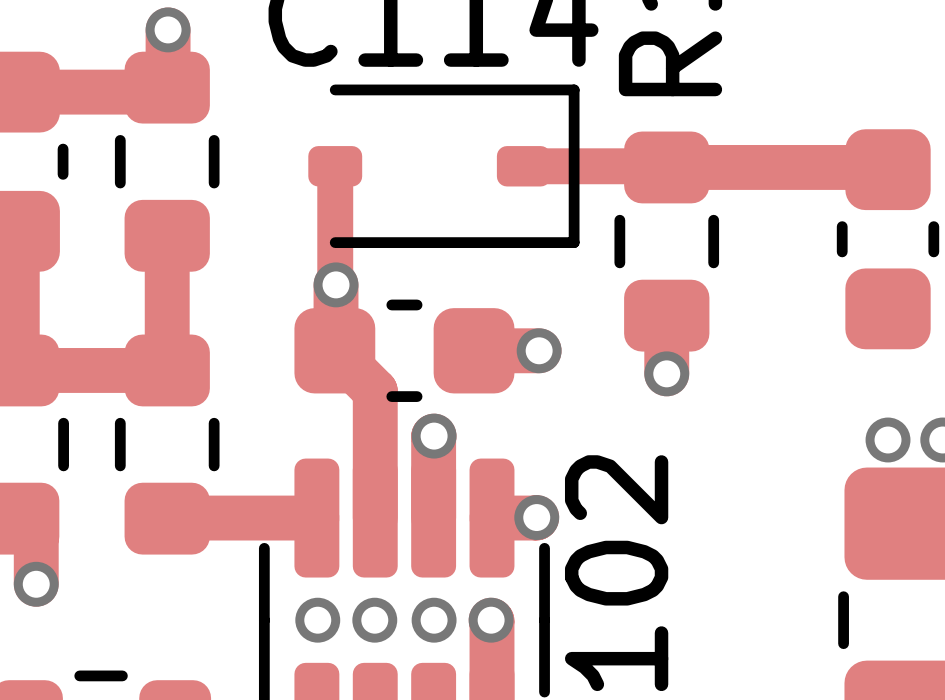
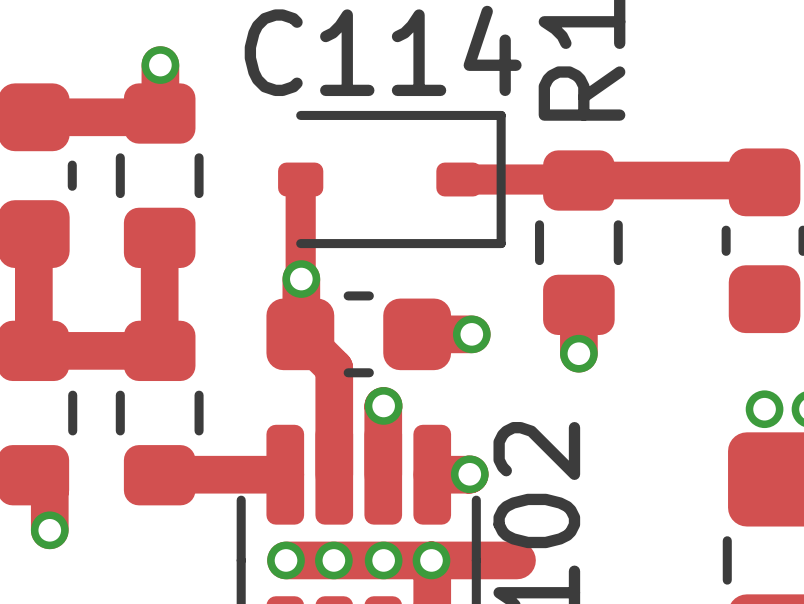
track: none -> (286, 560) (517, 560)

